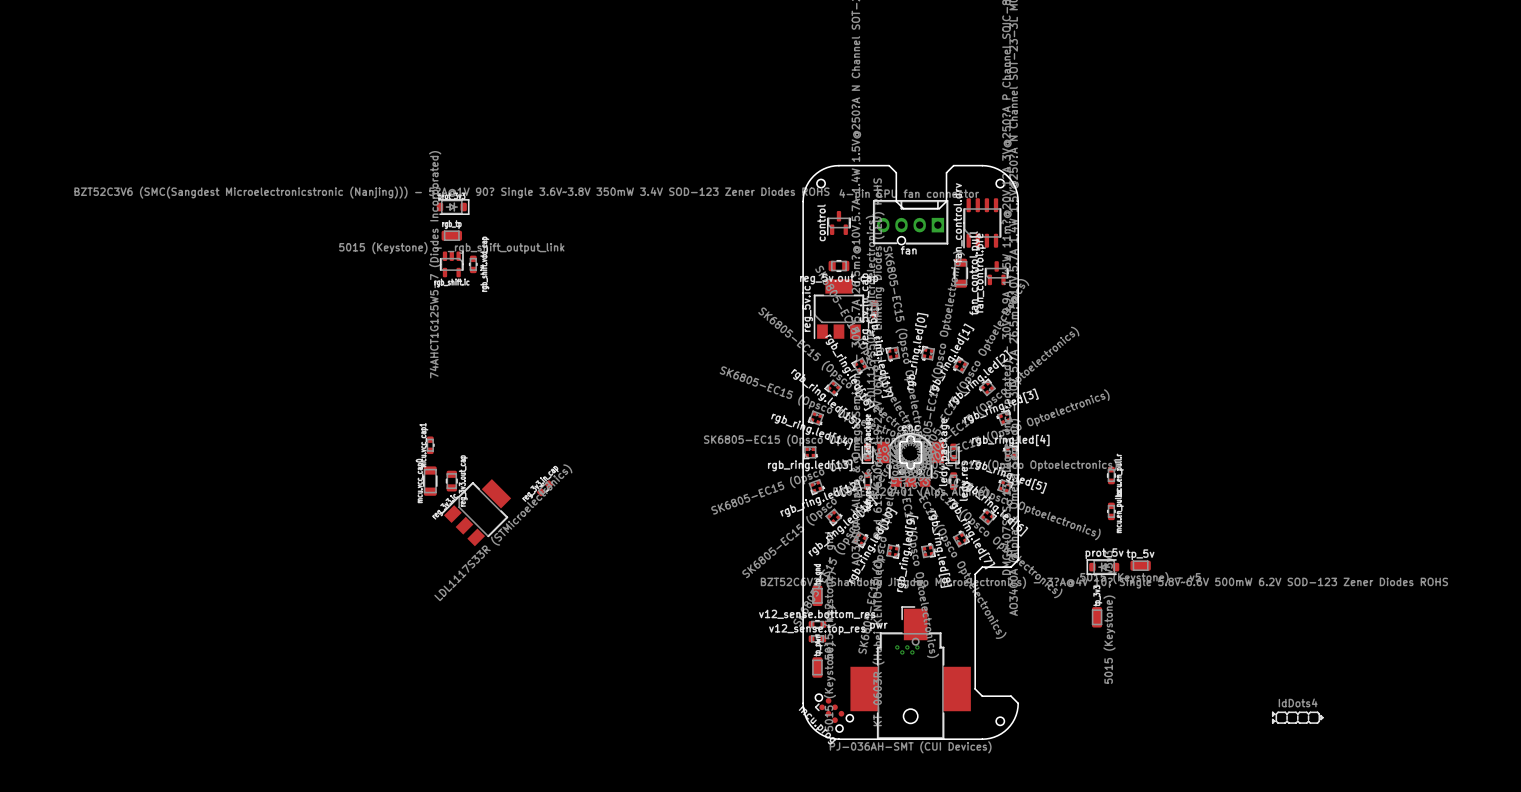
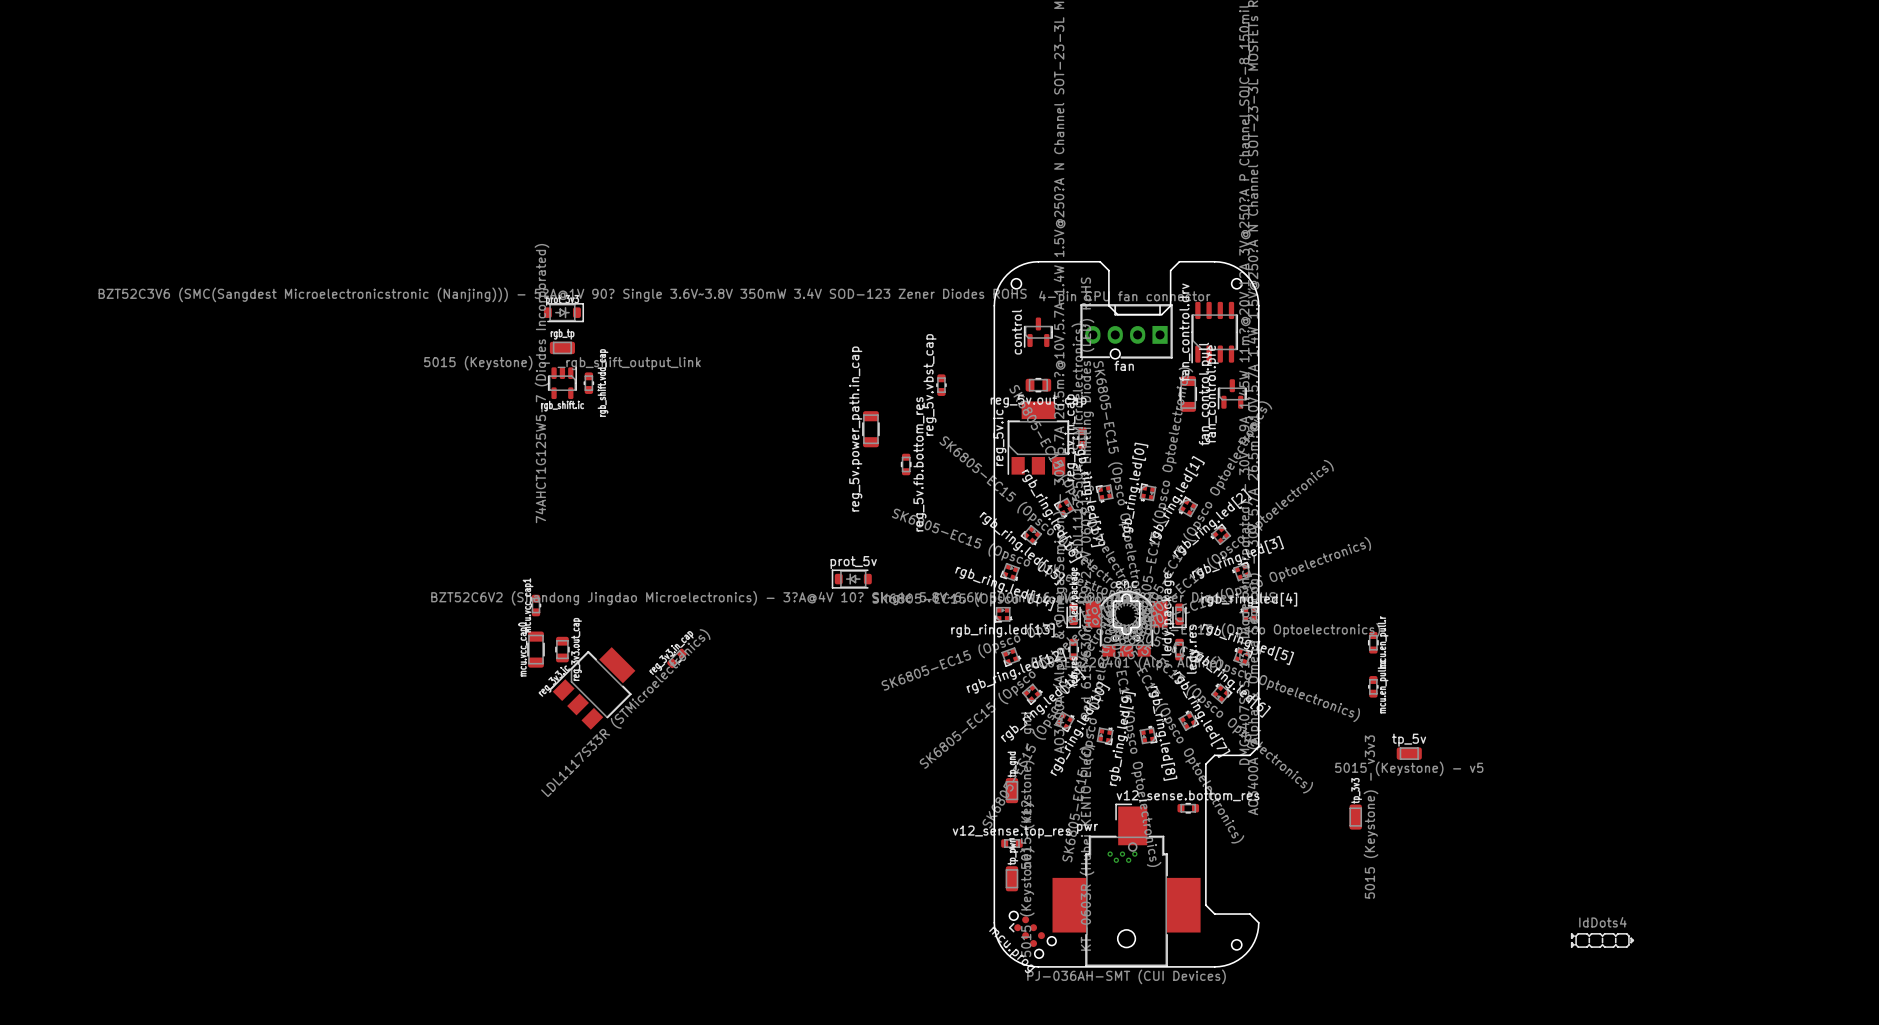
reg_5v.vbst_cap: none -> (941, 385)
reg_5v.power_path.in_cap: none -> (870, 429)
reg_5v.fb.bottom_res: none -> (906, 464)
prot_5v position: (1103, 567) -> (851, 579)
v12_sense.bottom_res position: (817, 624) -> (1188, 808)

